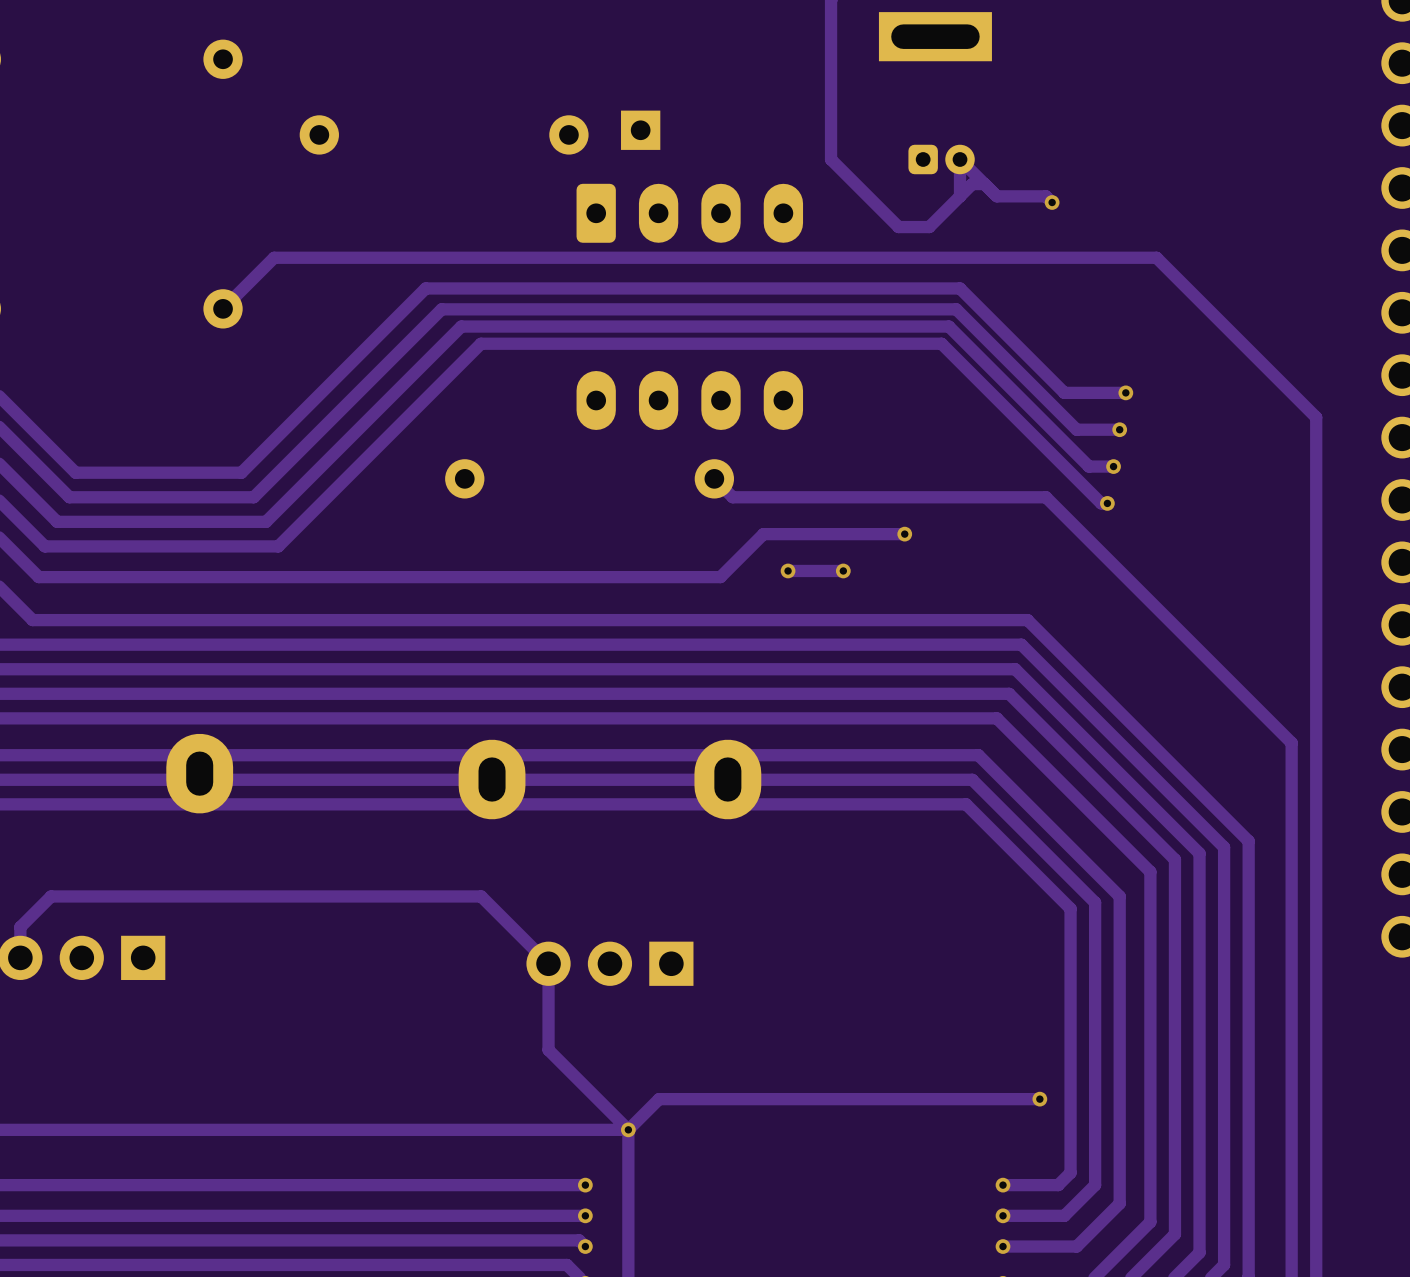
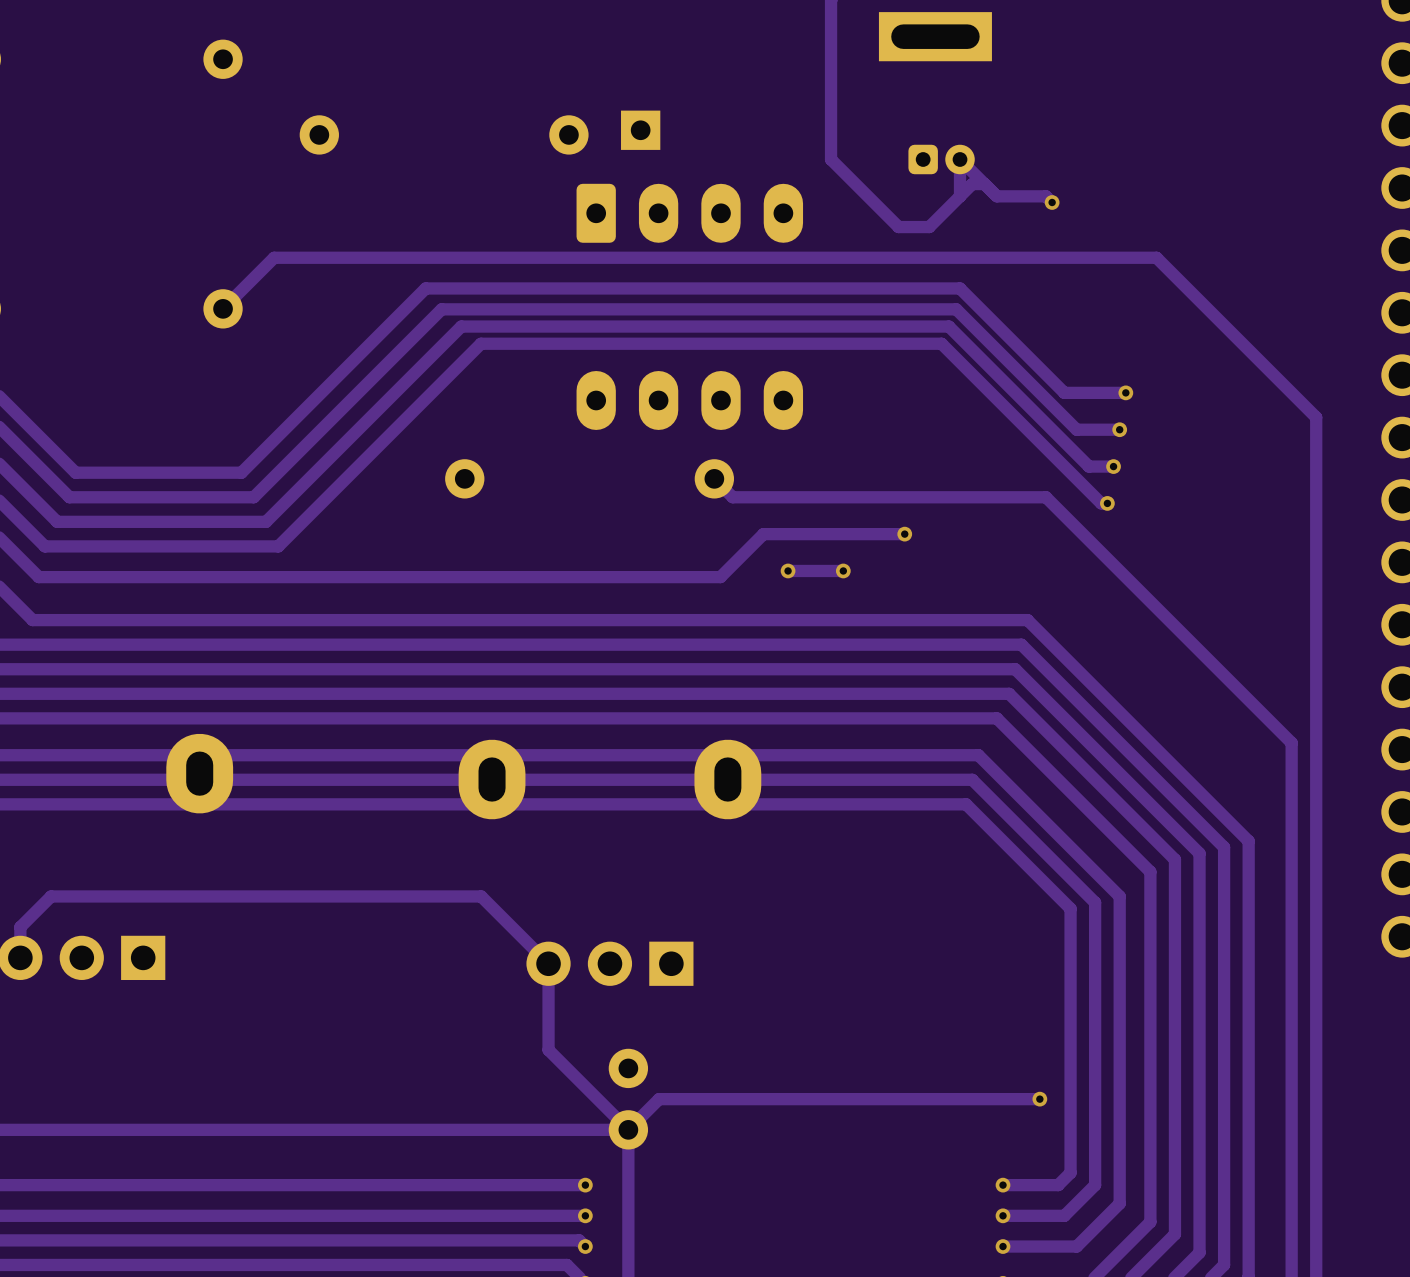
part: none -> (628, 1099)
via: (628, 1129) -> none

